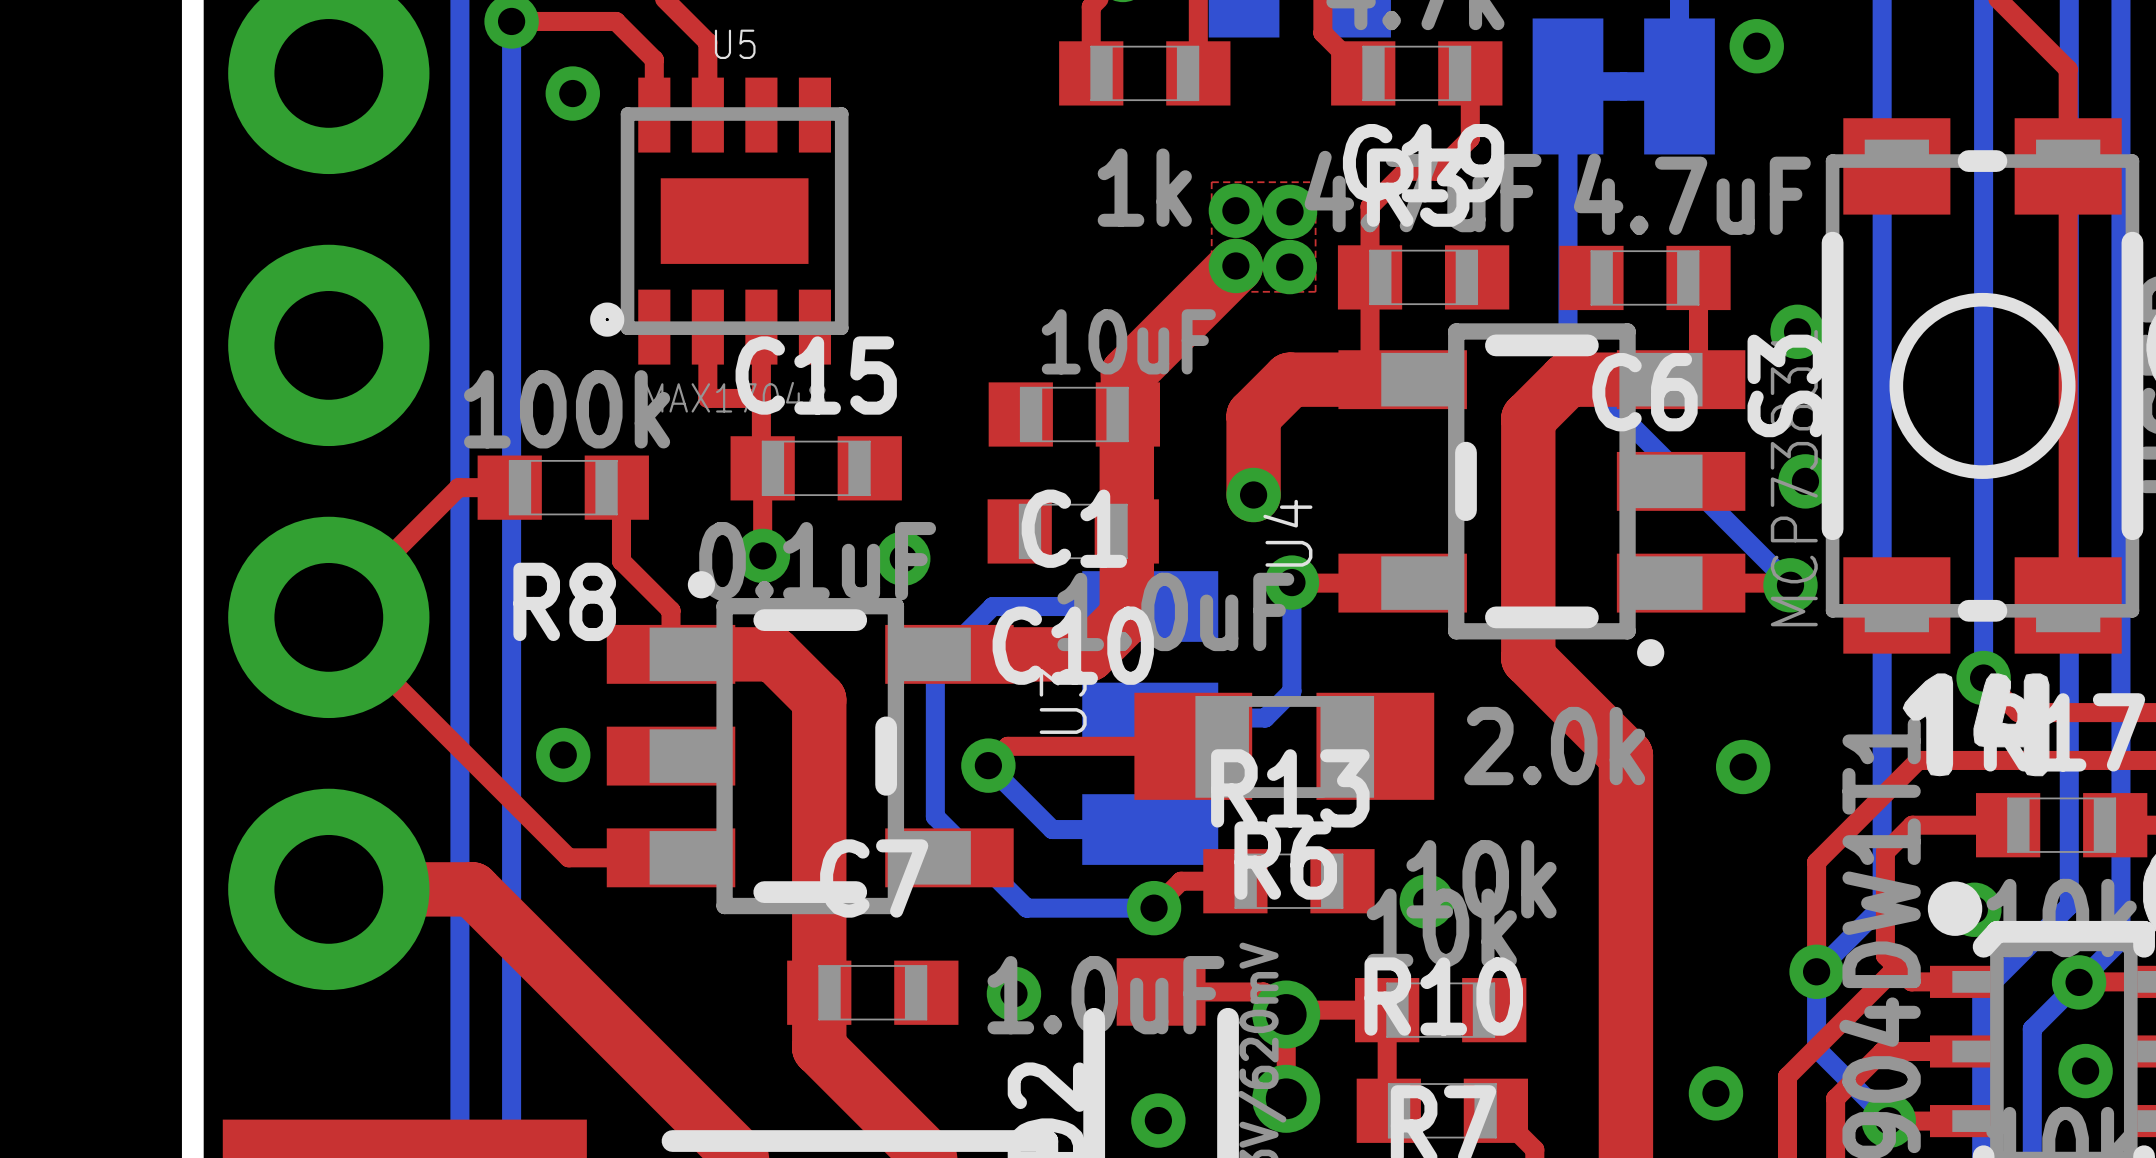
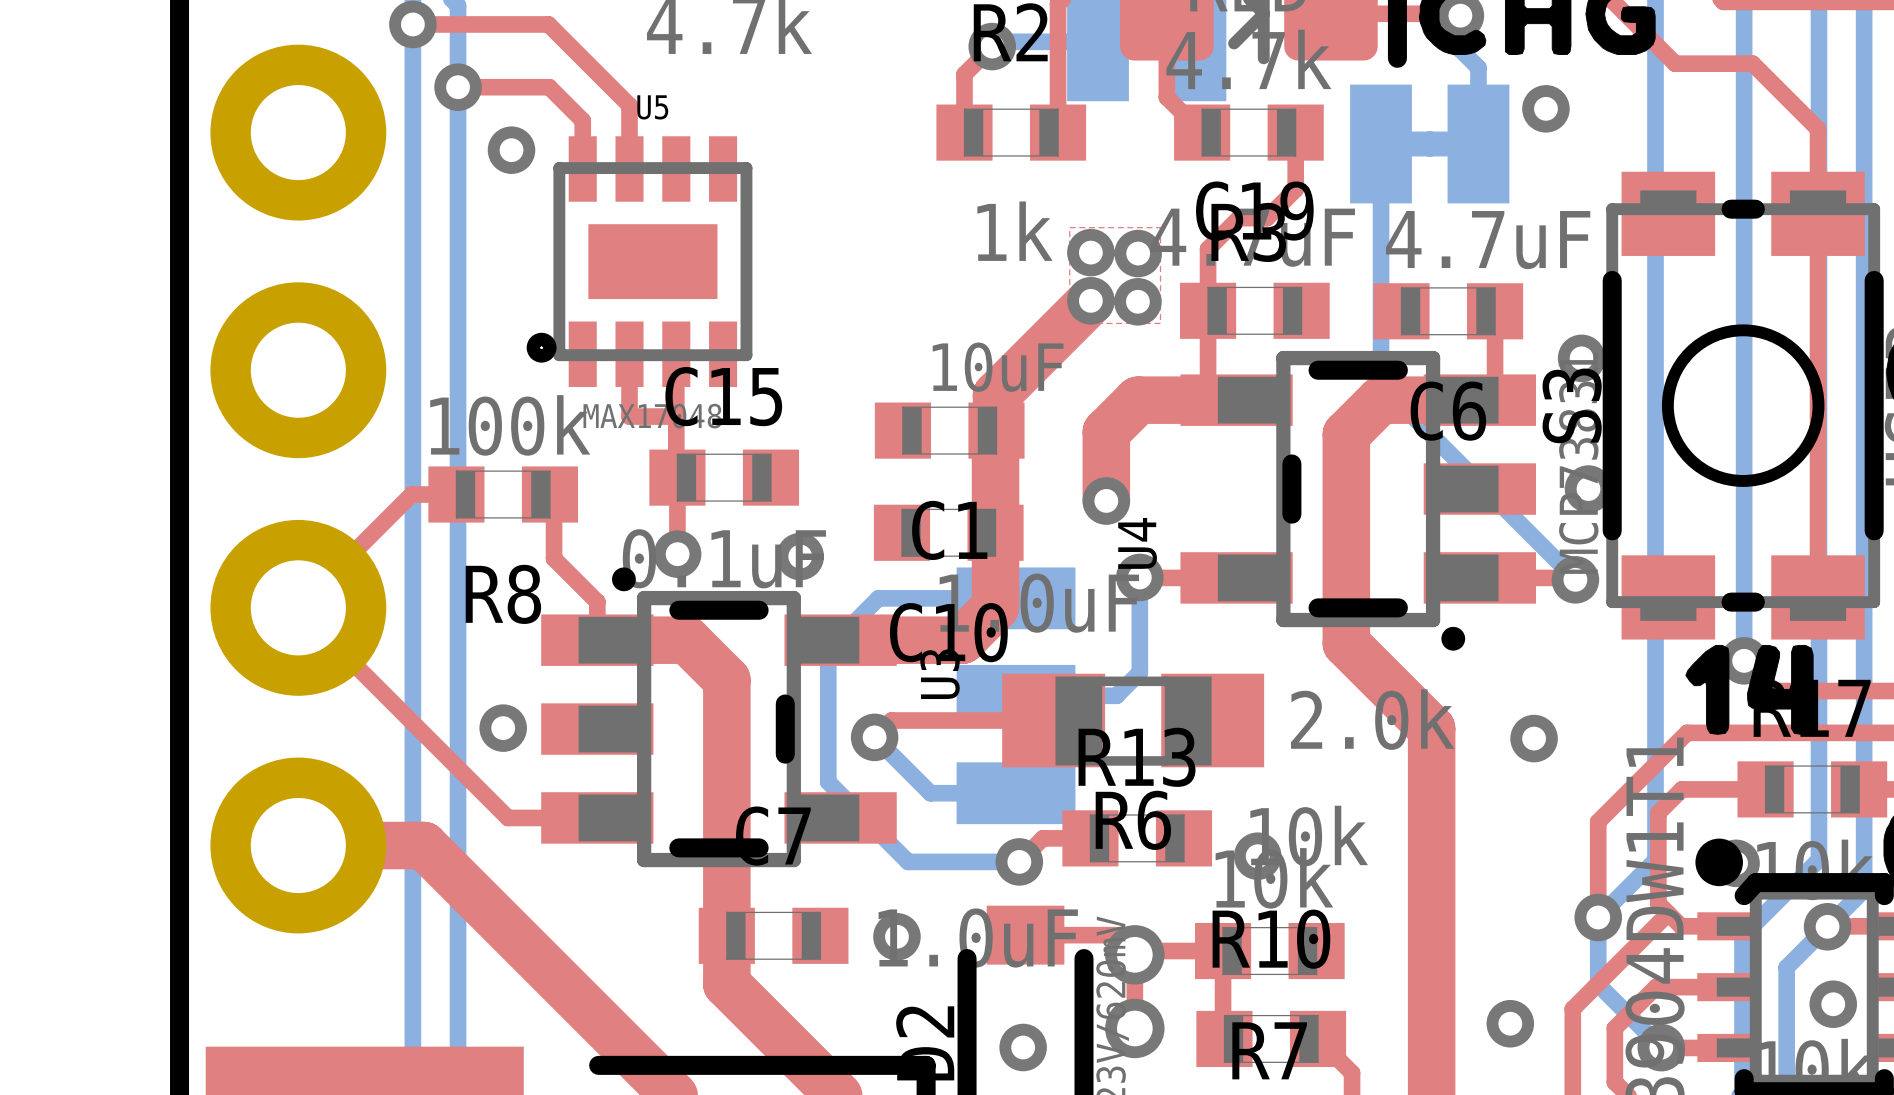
drawing position: (1976, 724) -> (1749, 689)

